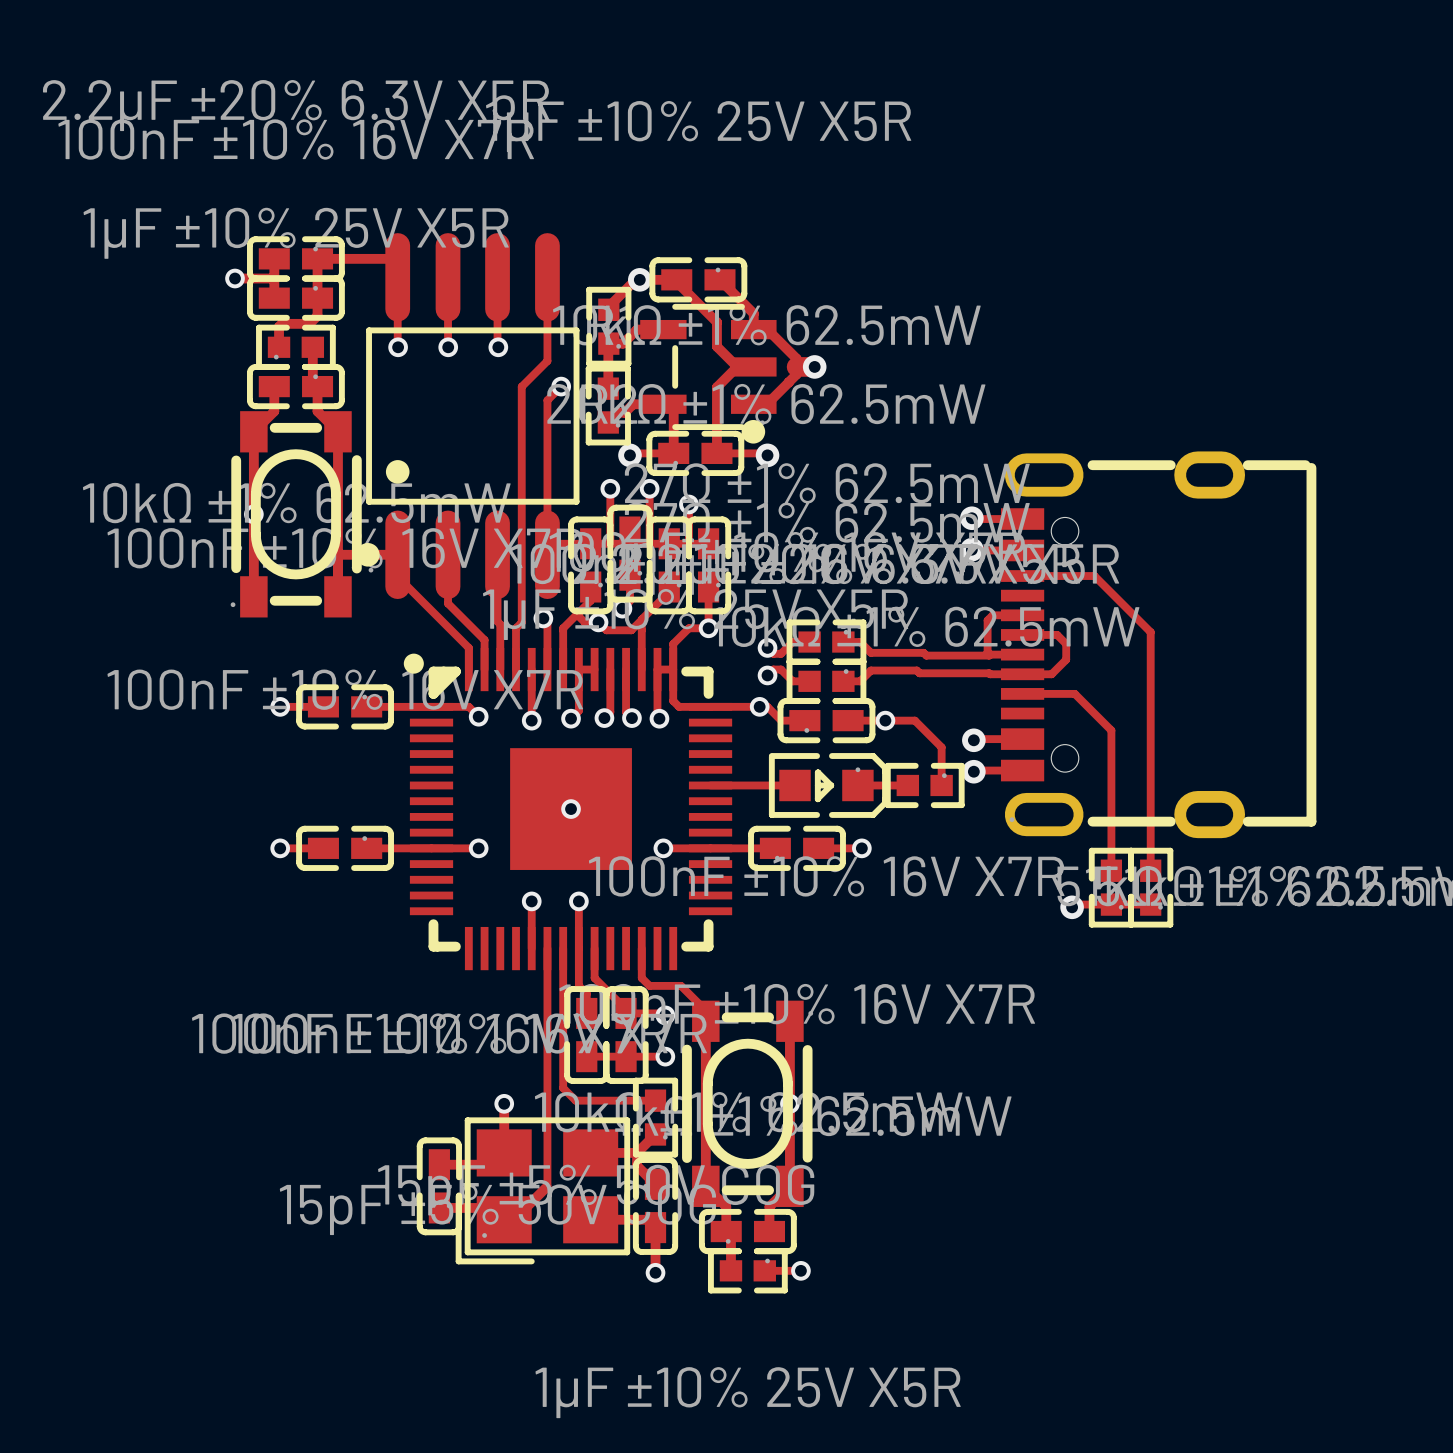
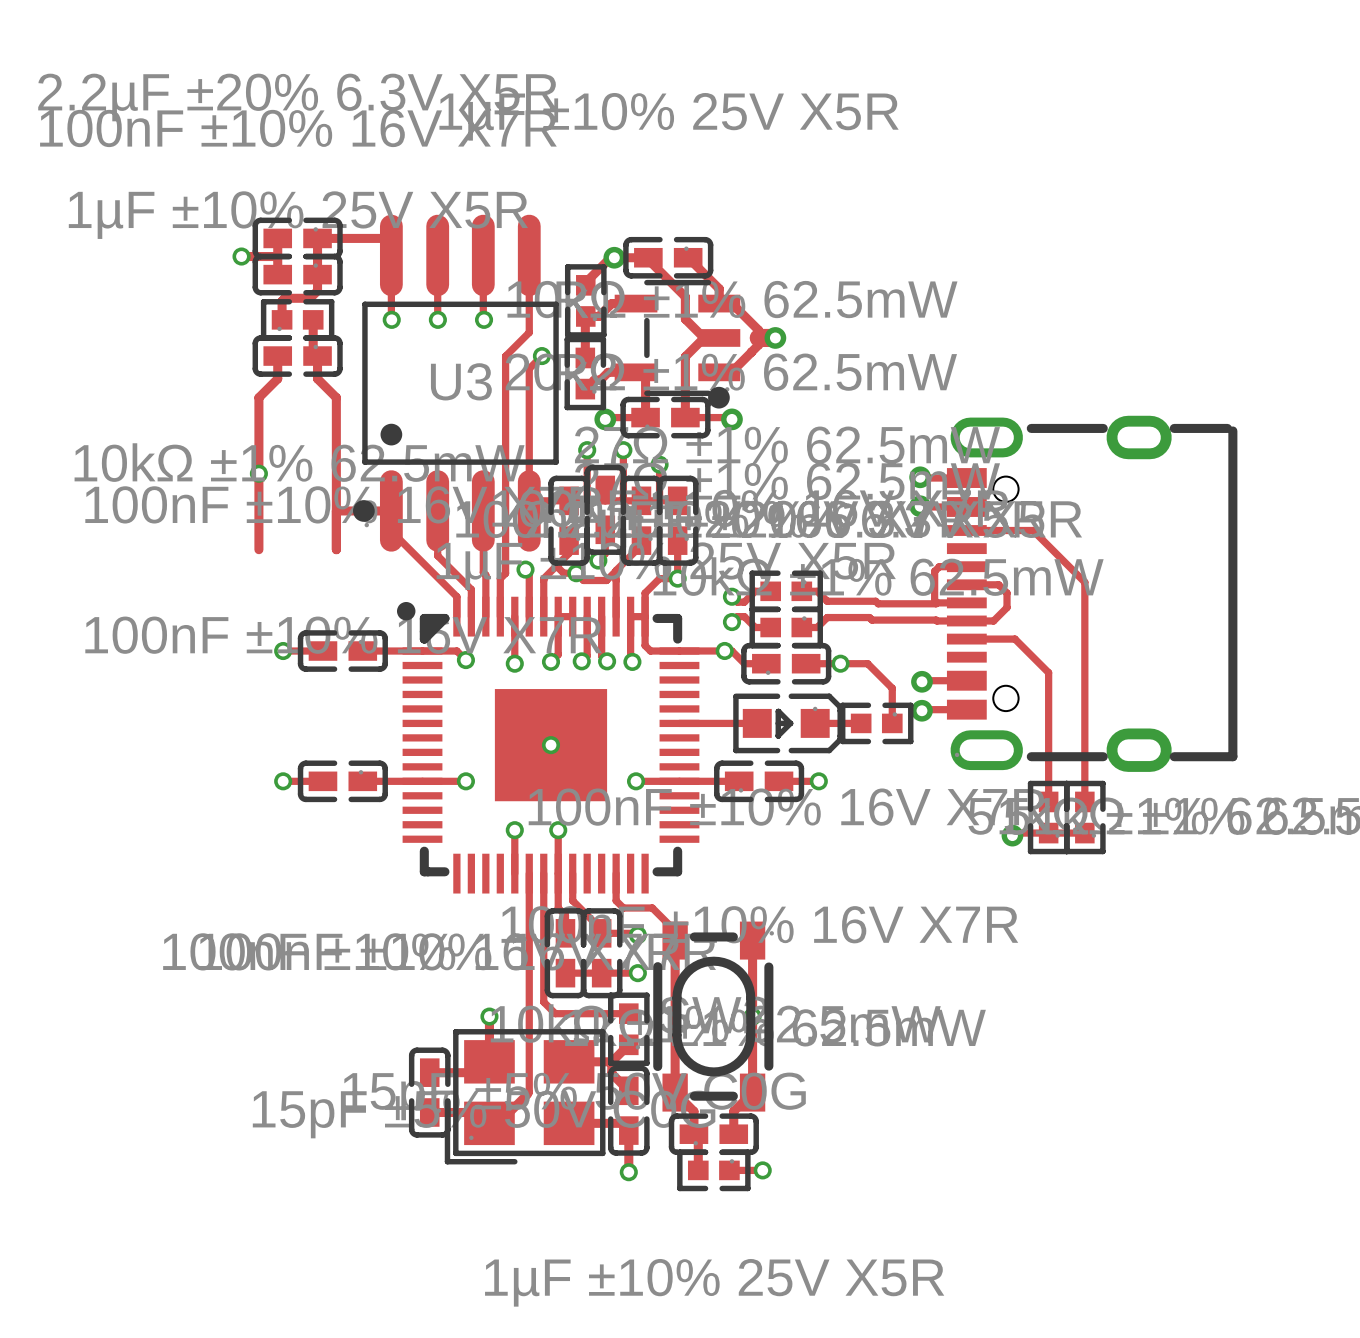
U3 name: none -> U3 (461, 381)
part: (296, 514) -> none
part: (747, 1103) -> none
part: none -> (713, 1016)

